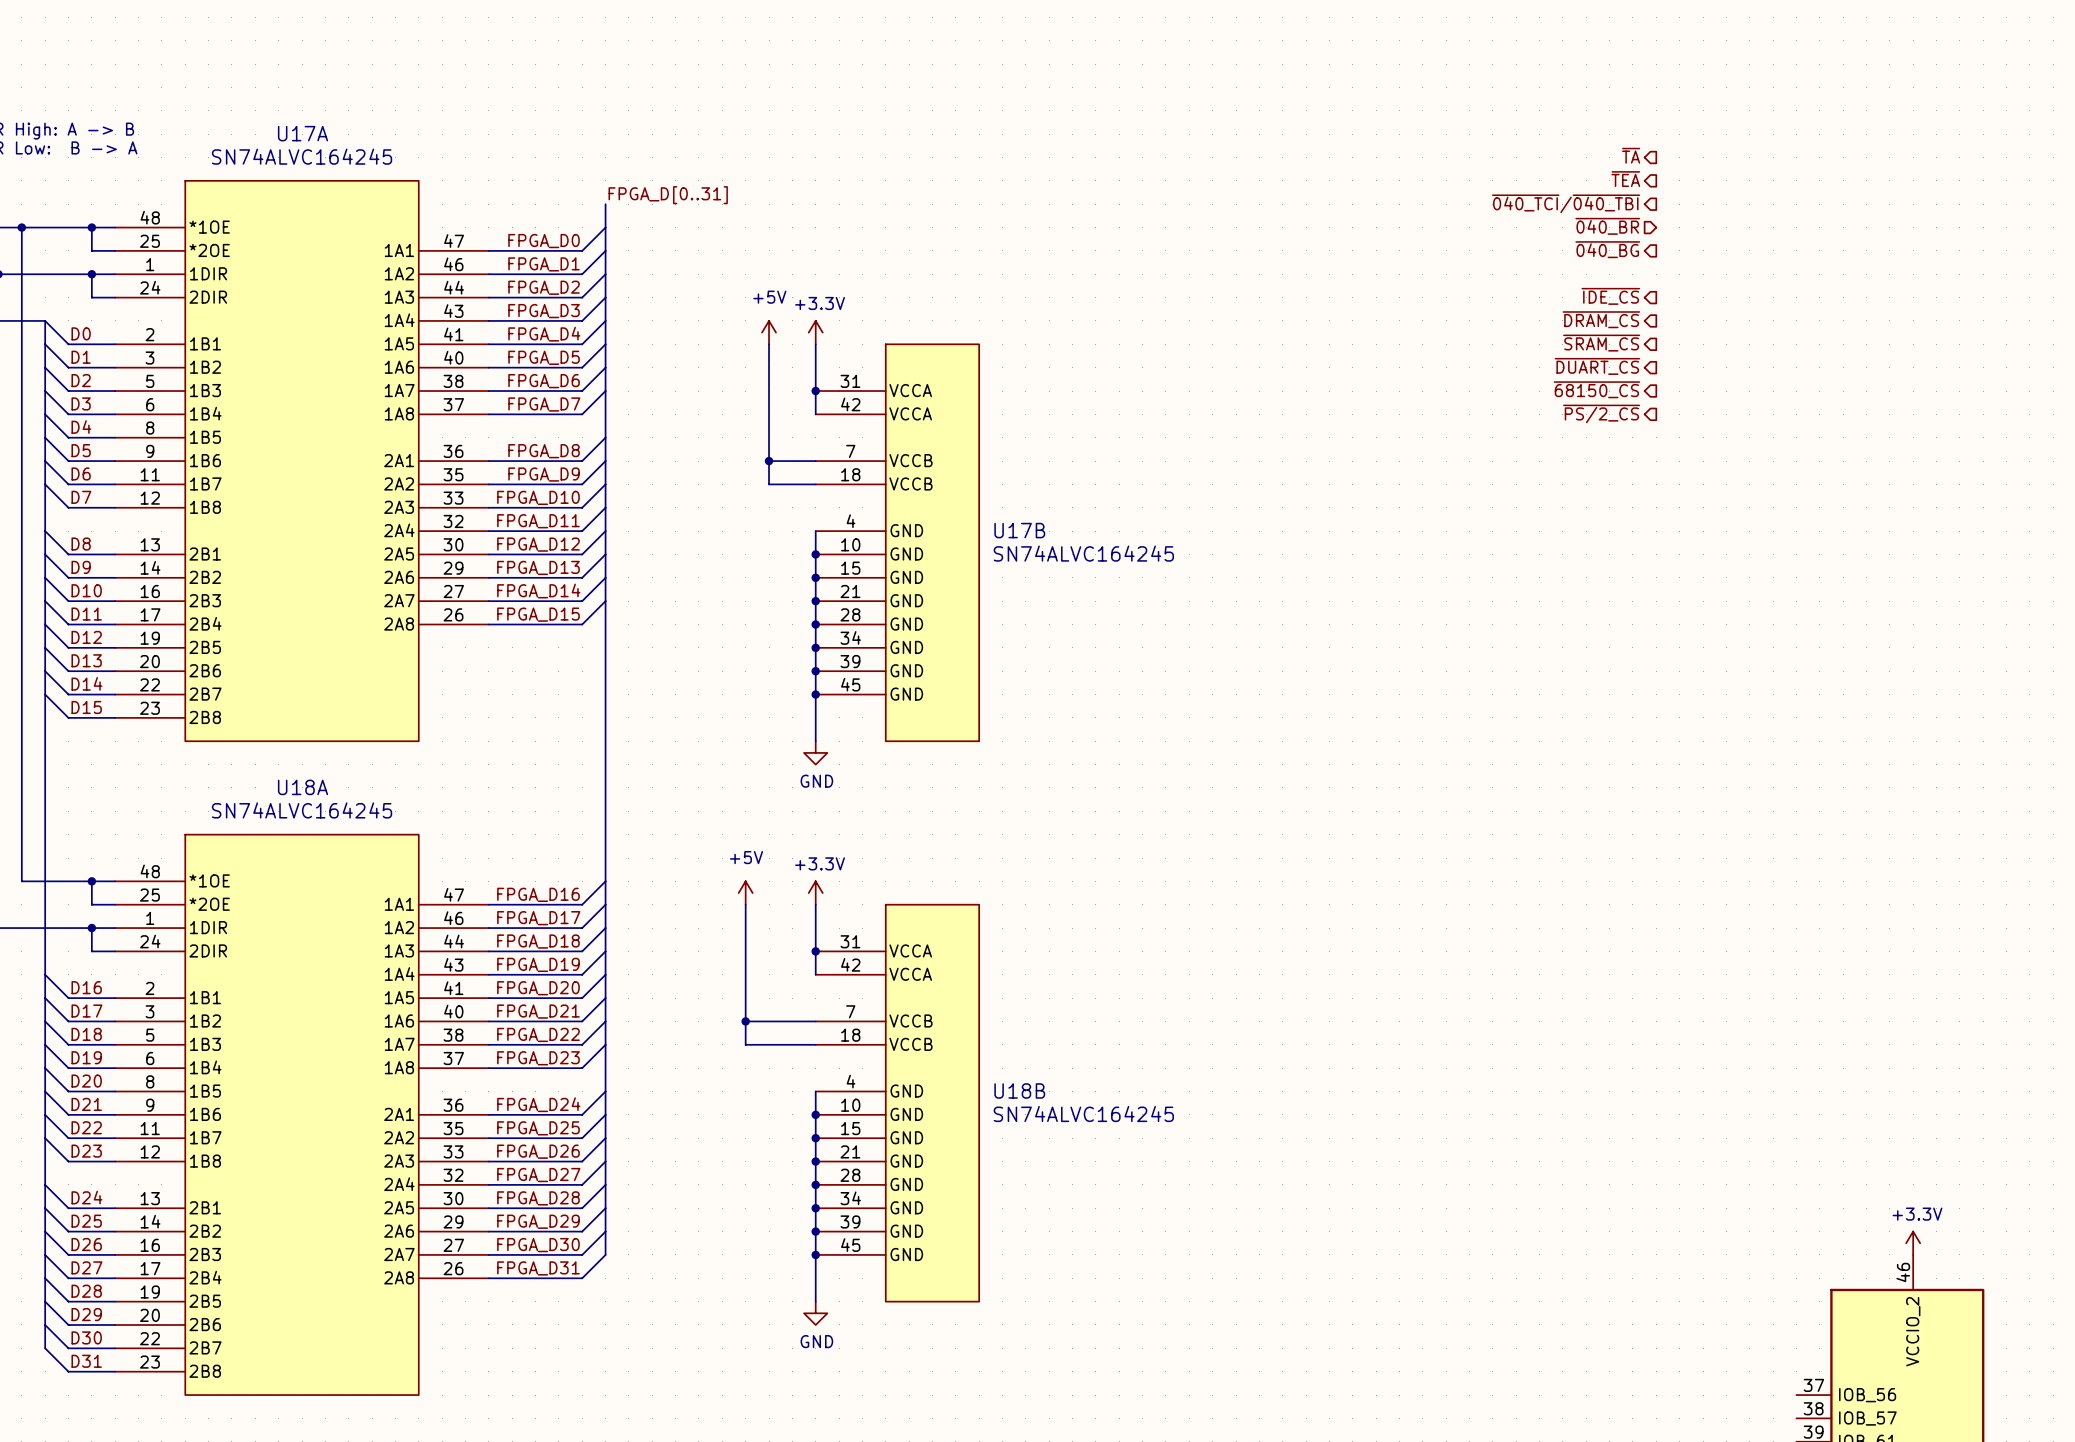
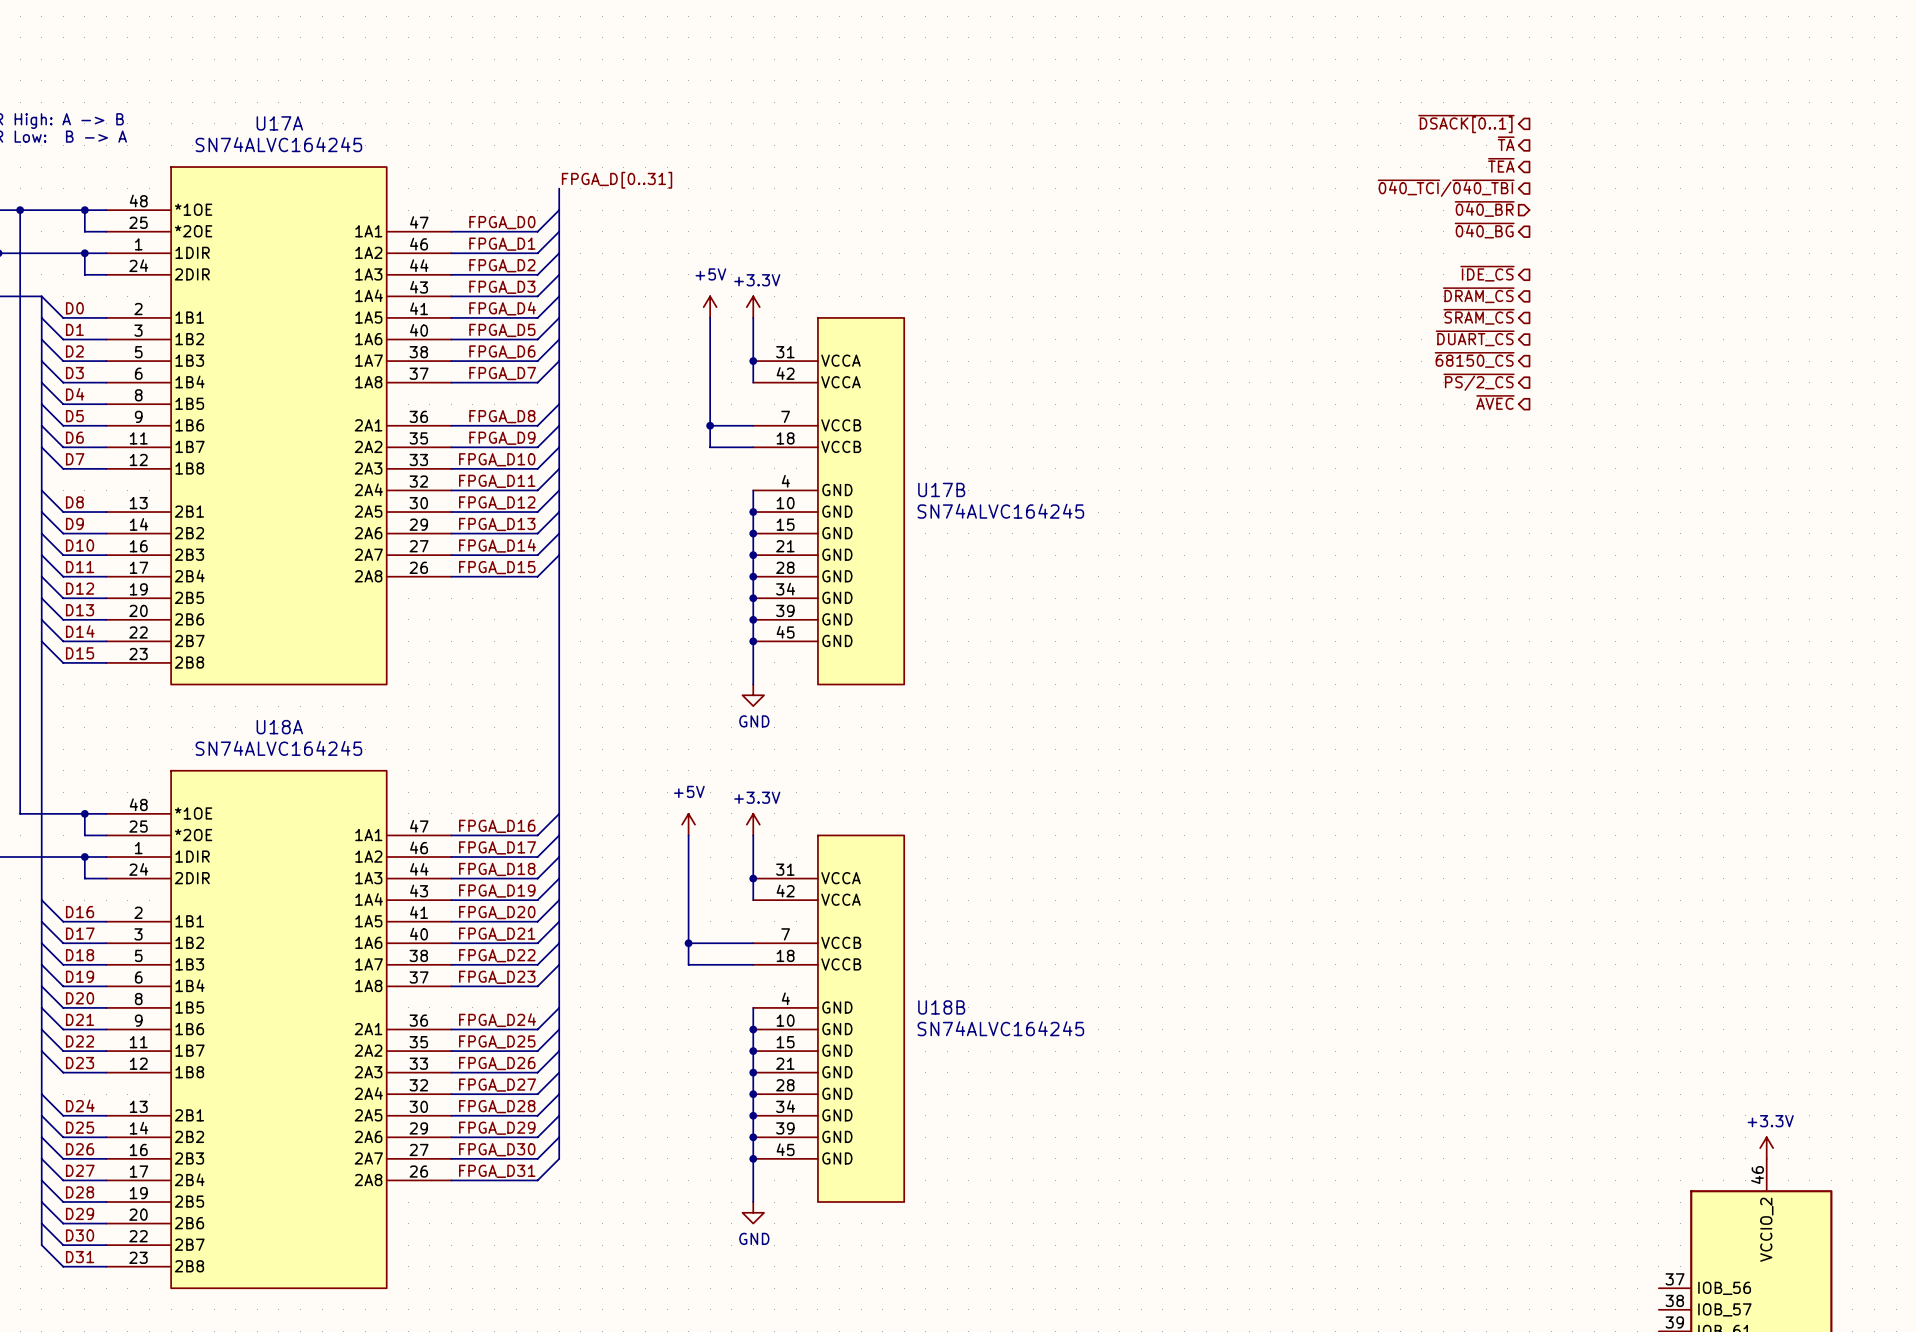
hierarchical label: none -> ~{DSACK[0..1]} (1466, 124)
hierarchical label: none -> ~{AVEC} (1495, 402)

